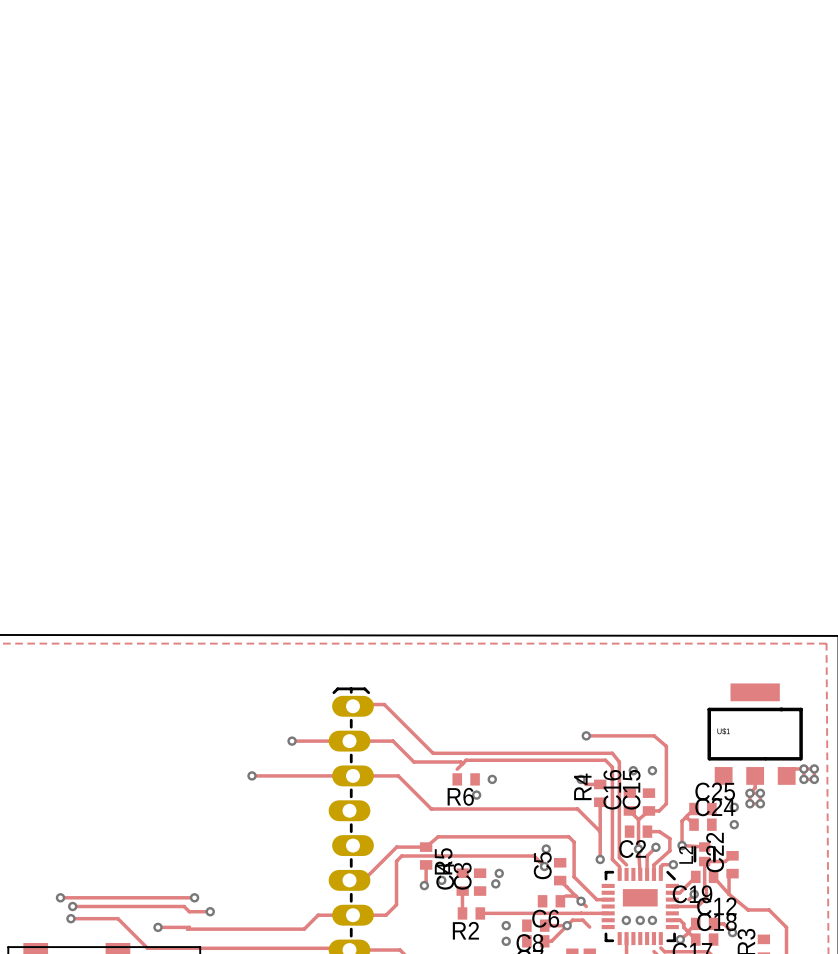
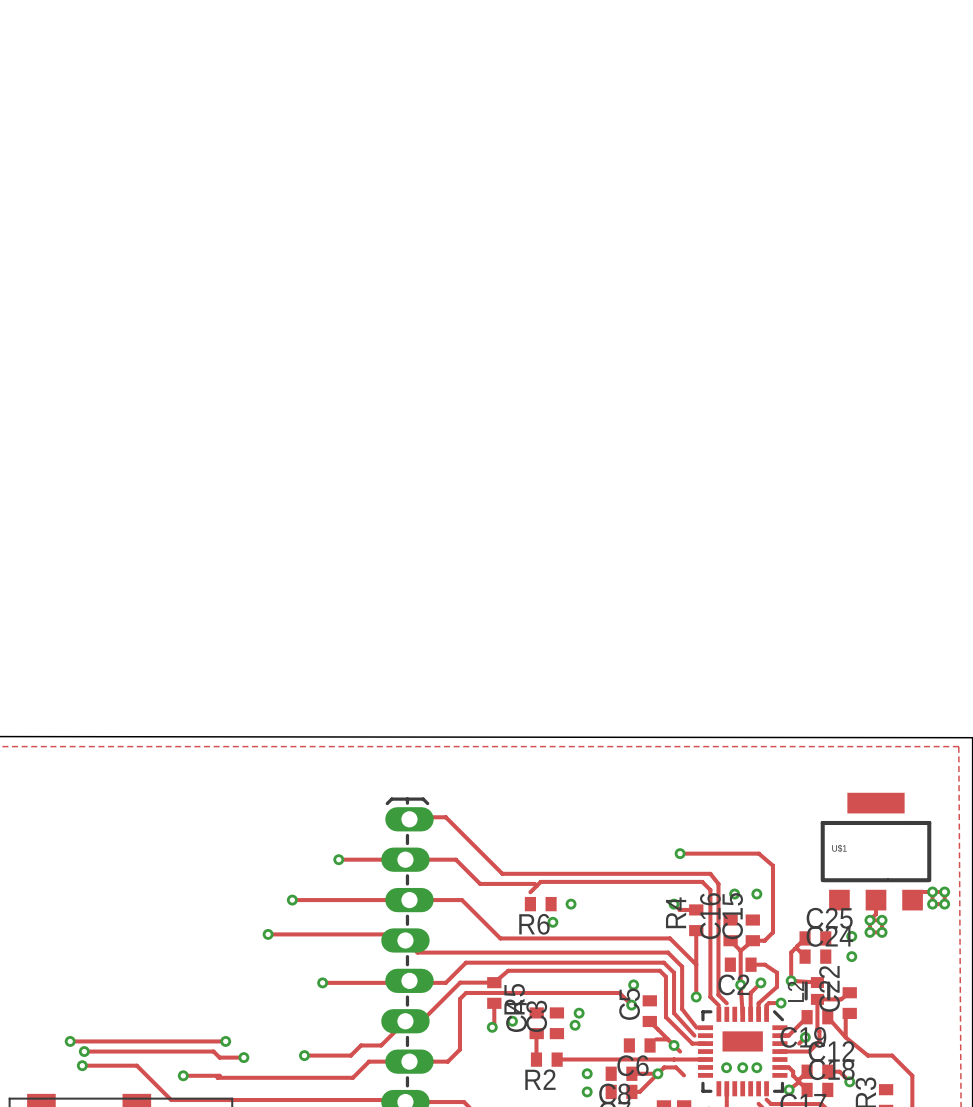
track: none -> (268, 934) (399, 934) (417, 952) (667, 952) (682, 966) (682, 1009) (696, 1027)
via: none -> (268, 934)
track: none -> (322, 982) (407, 982) (409, 980) (411, 982) (445, 982) (466, 962) (663, 962) (674, 972) (674, 1013) (694, 1035)
via: none -> (322, 982)
track: none -> (421, 1021) (405, 1021) (381, 1045) (361, 1045) (350, 1055) (304, 1055)
via: none -> (304, 1055)

